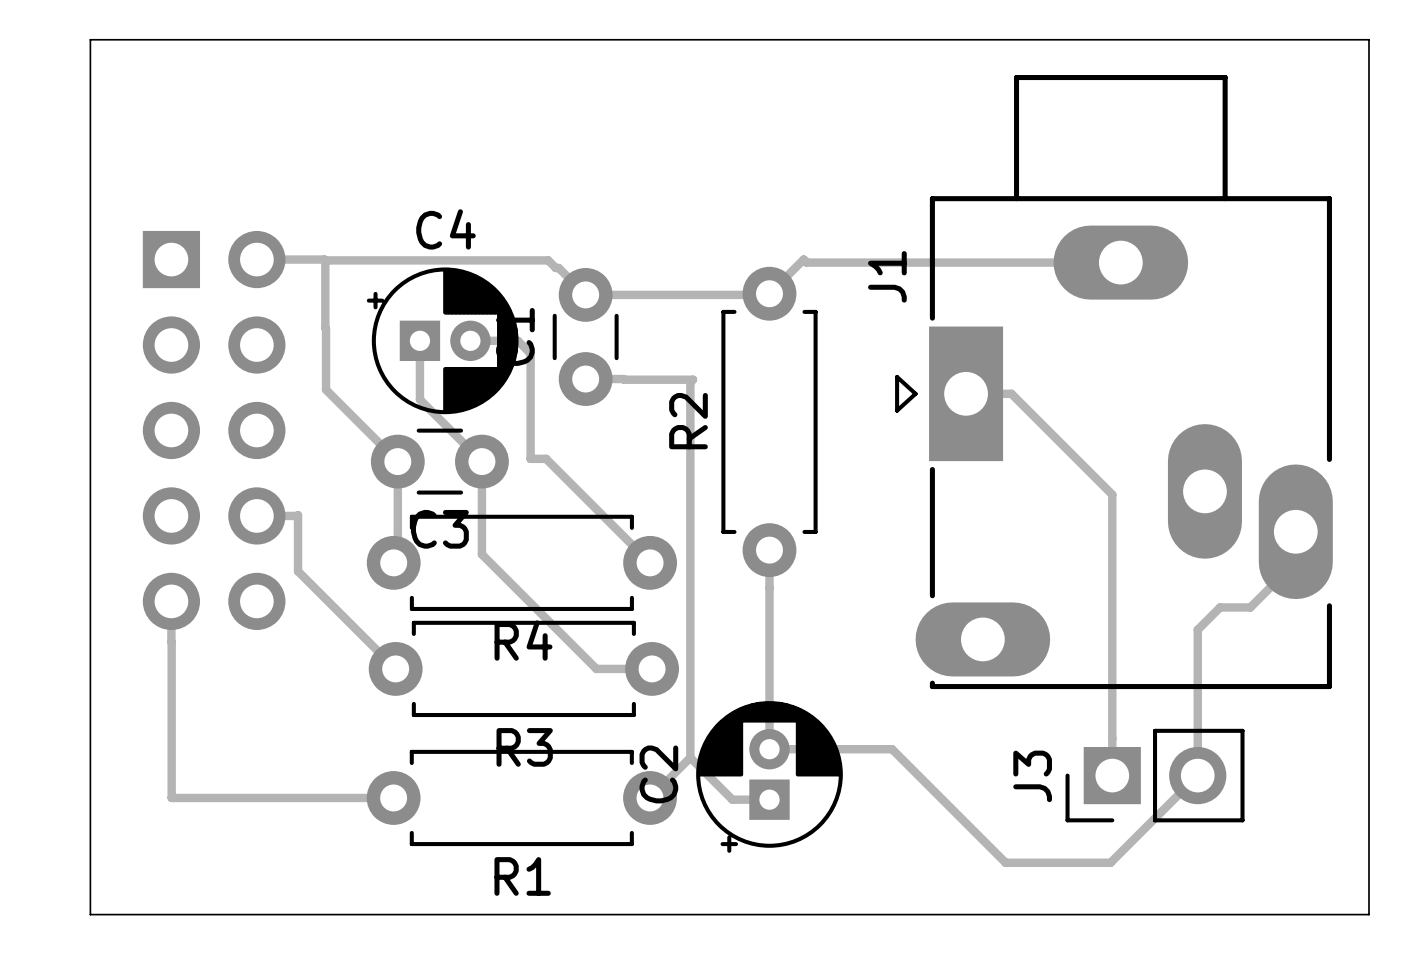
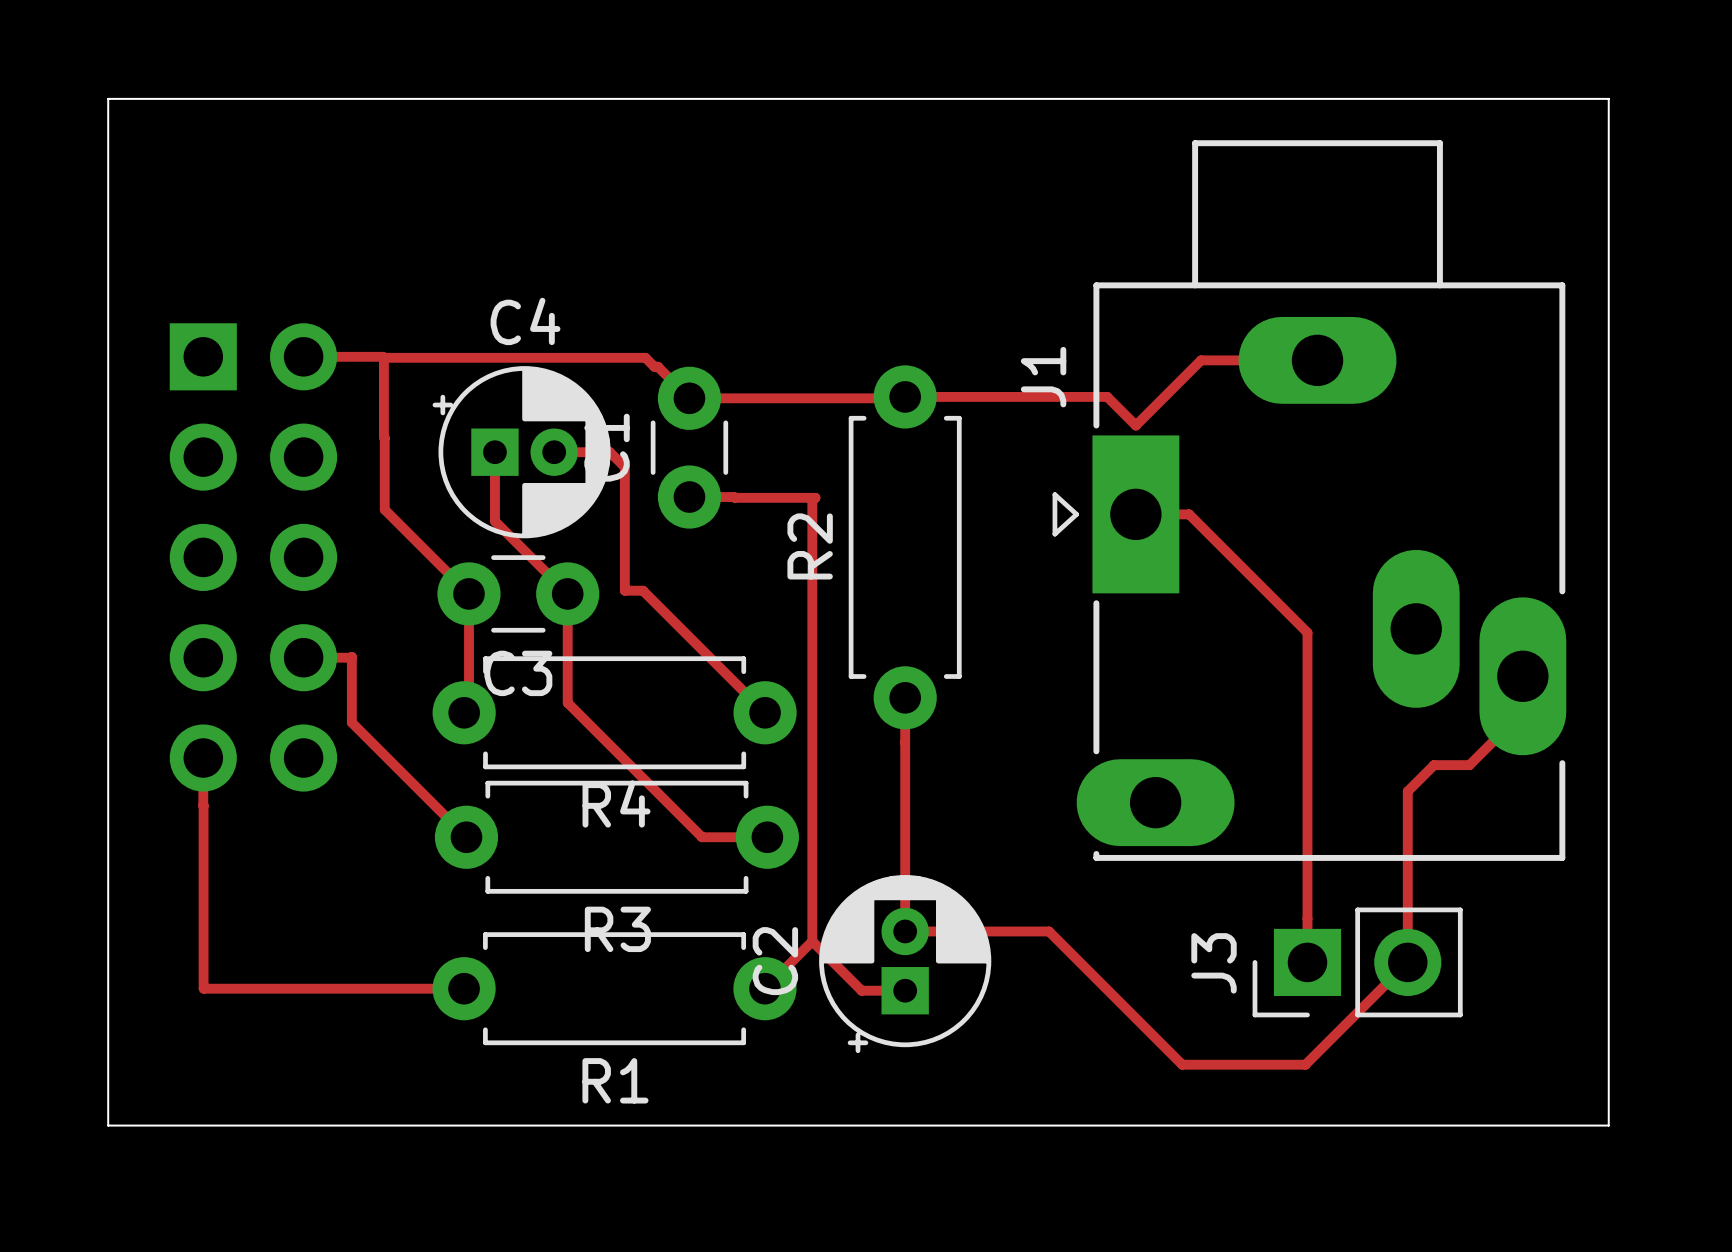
track: (1021, 262) (806, 262) (803, 259) (769, 293) -> (1201, 360) (1135, 425) (1107, 396) (905, 396)

